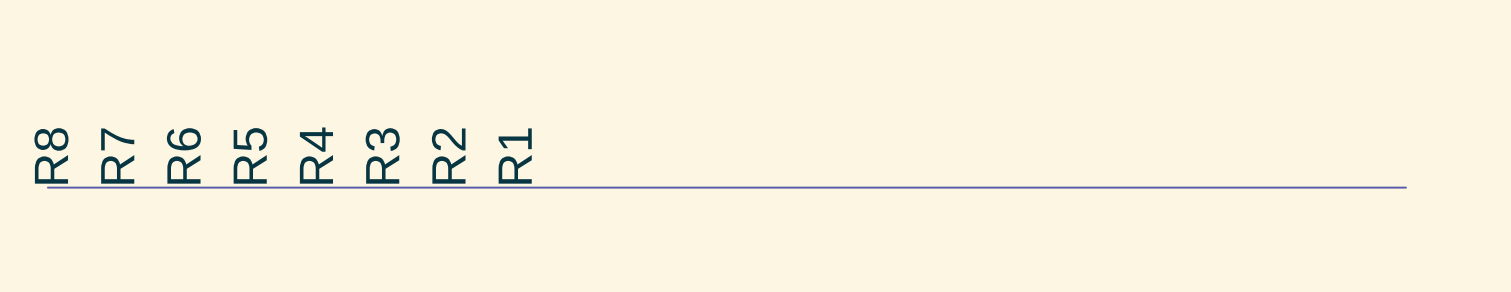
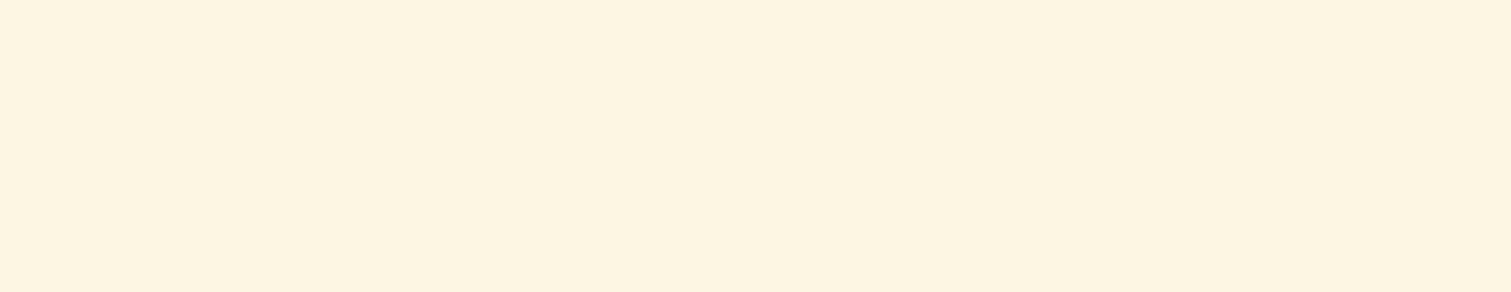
label: R8 (51, 155) -> none
label: R6 (183, 155) -> none
label: R5 (250, 155) -> none
label: R4 (316, 155) -> none
label: R3 (382, 155) -> none
label: R7 (117, 156) -> none
label: R2 (448, 156) -> none
label: R1 (515, 156) -> none
bus: (47, 187) (1405, 187) -> none

